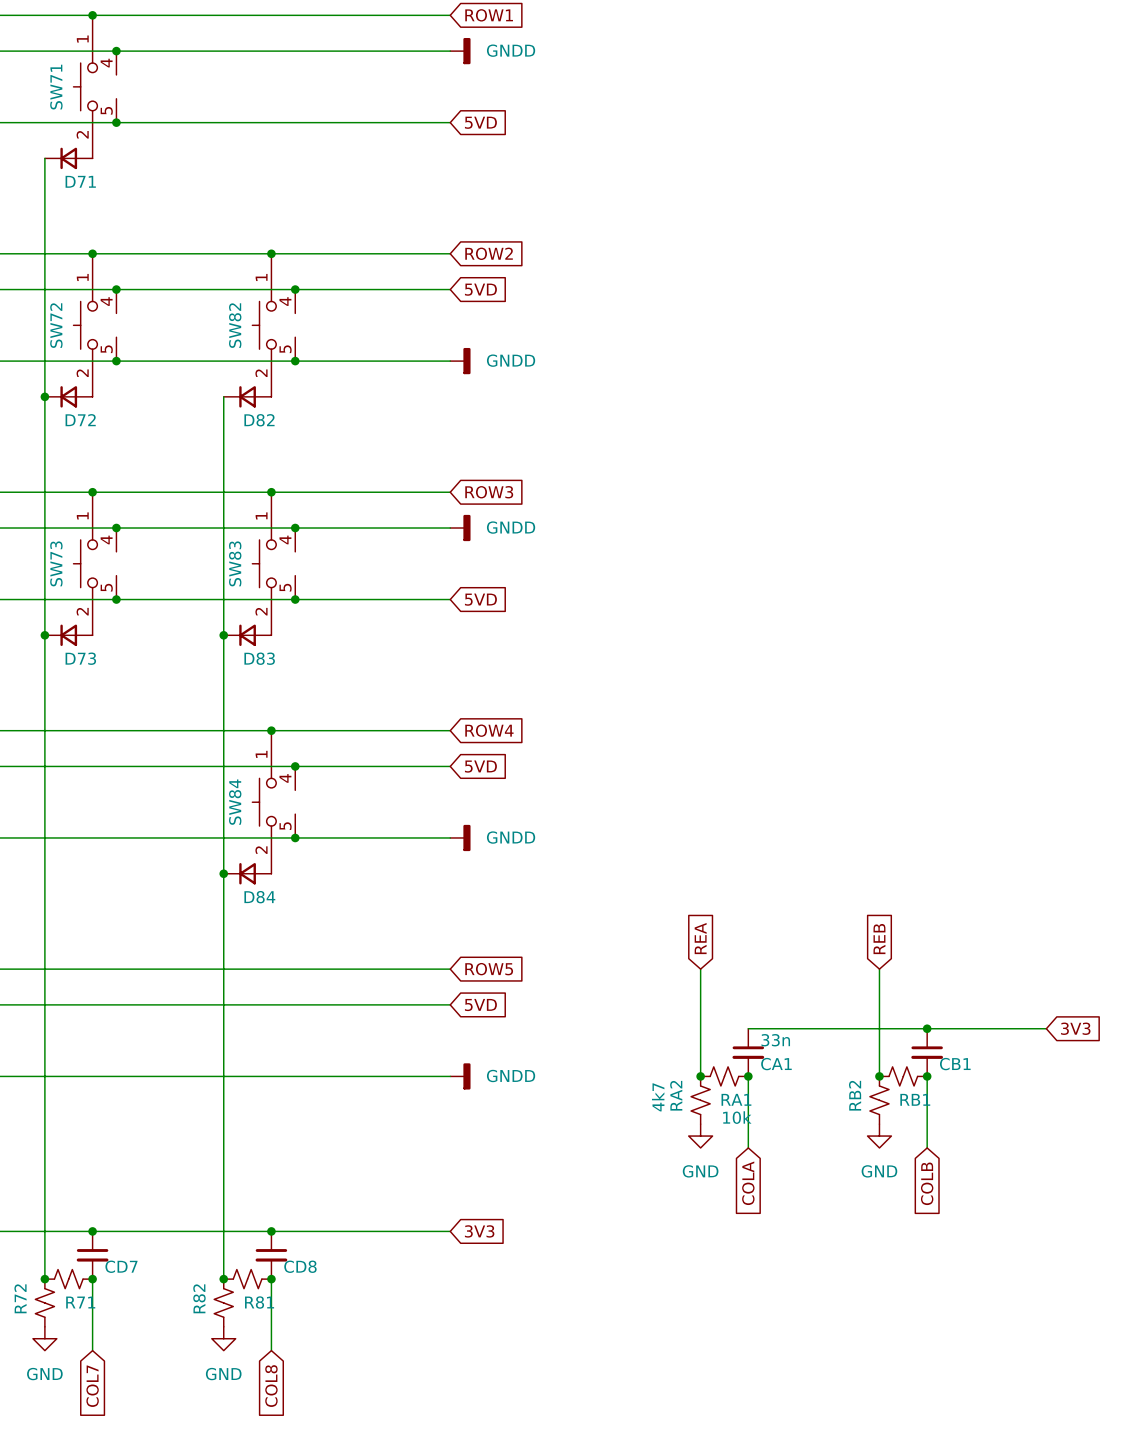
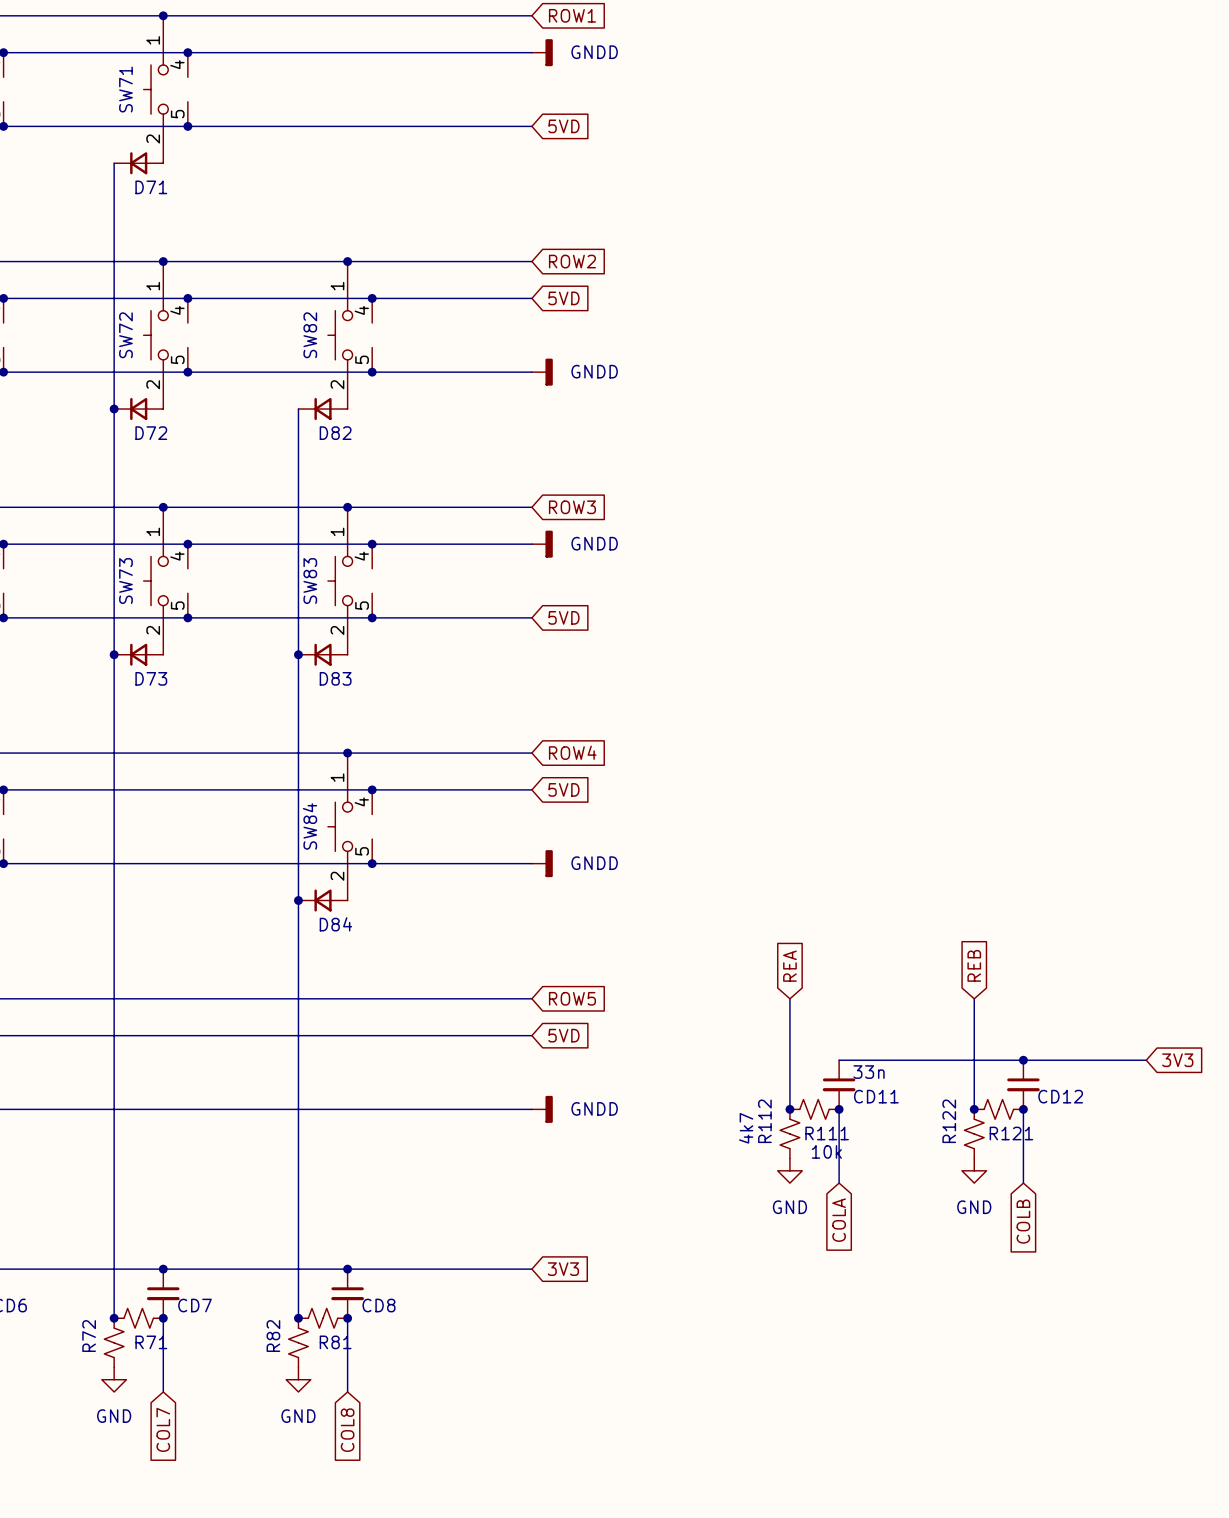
CA1 name: CA1 (776, 1064) -> CD11 (876, 1096)
CB1 name: CB1 (955, 1064) -> CD12 (1060, 1096)
RA2 name: RA2 (676, 1095) -> R112 (764, 1121)
RB2 name: RB2 (855, 1095) -> R122 (949, 1121)
RA1 name: RA1 (736, 1099) -> R111 (827, 1133)
RB1 name: RB1 (915, 1099) -> R121 (1011, 1133)

